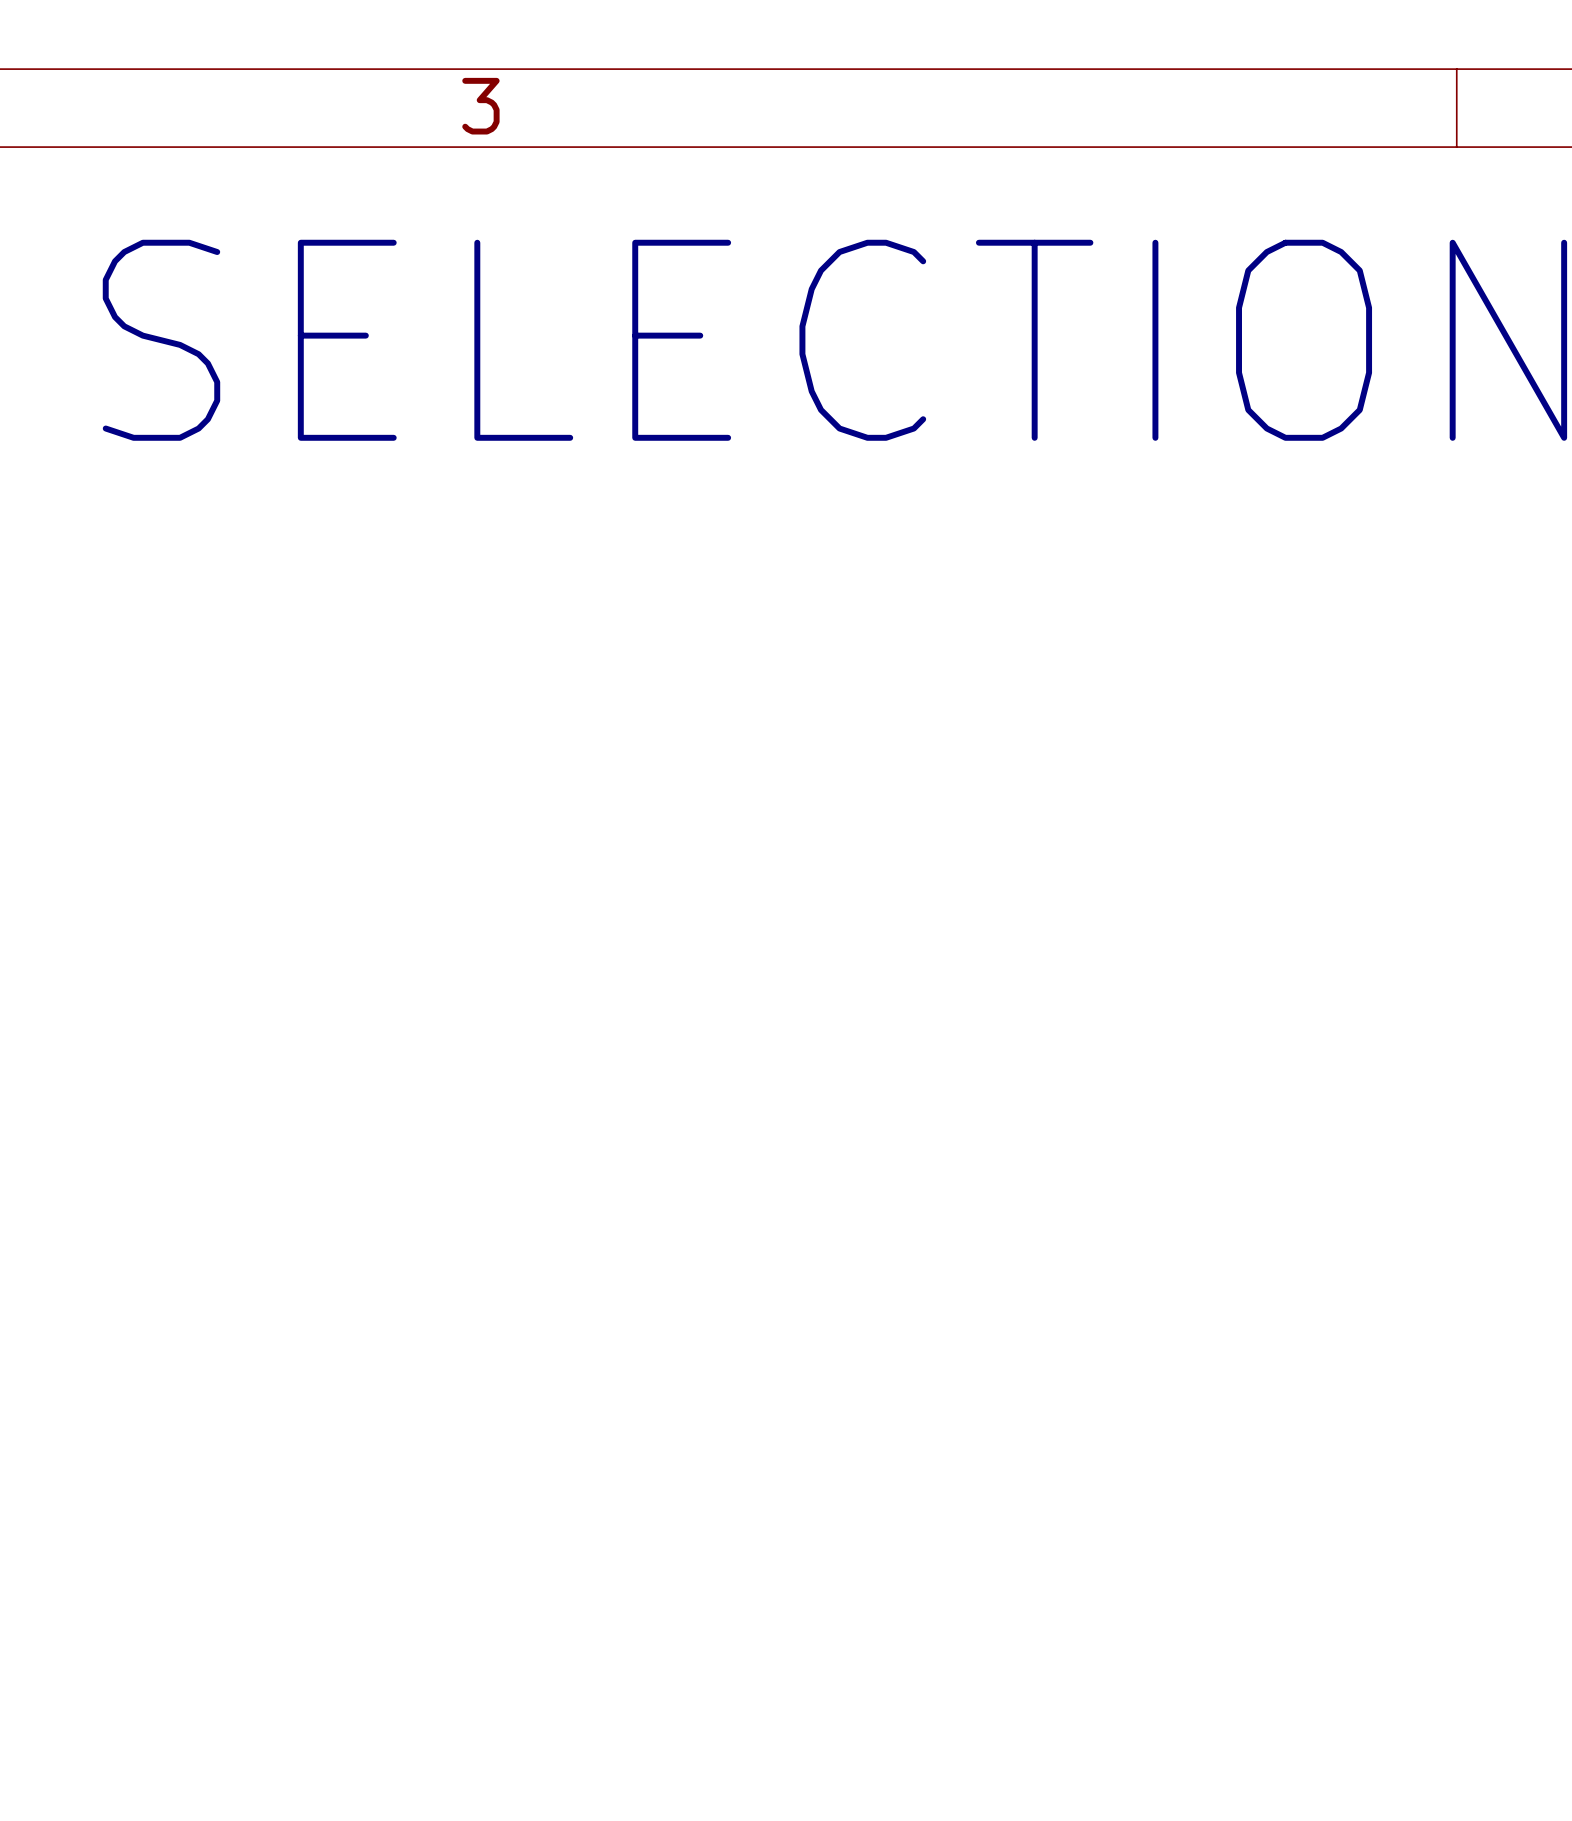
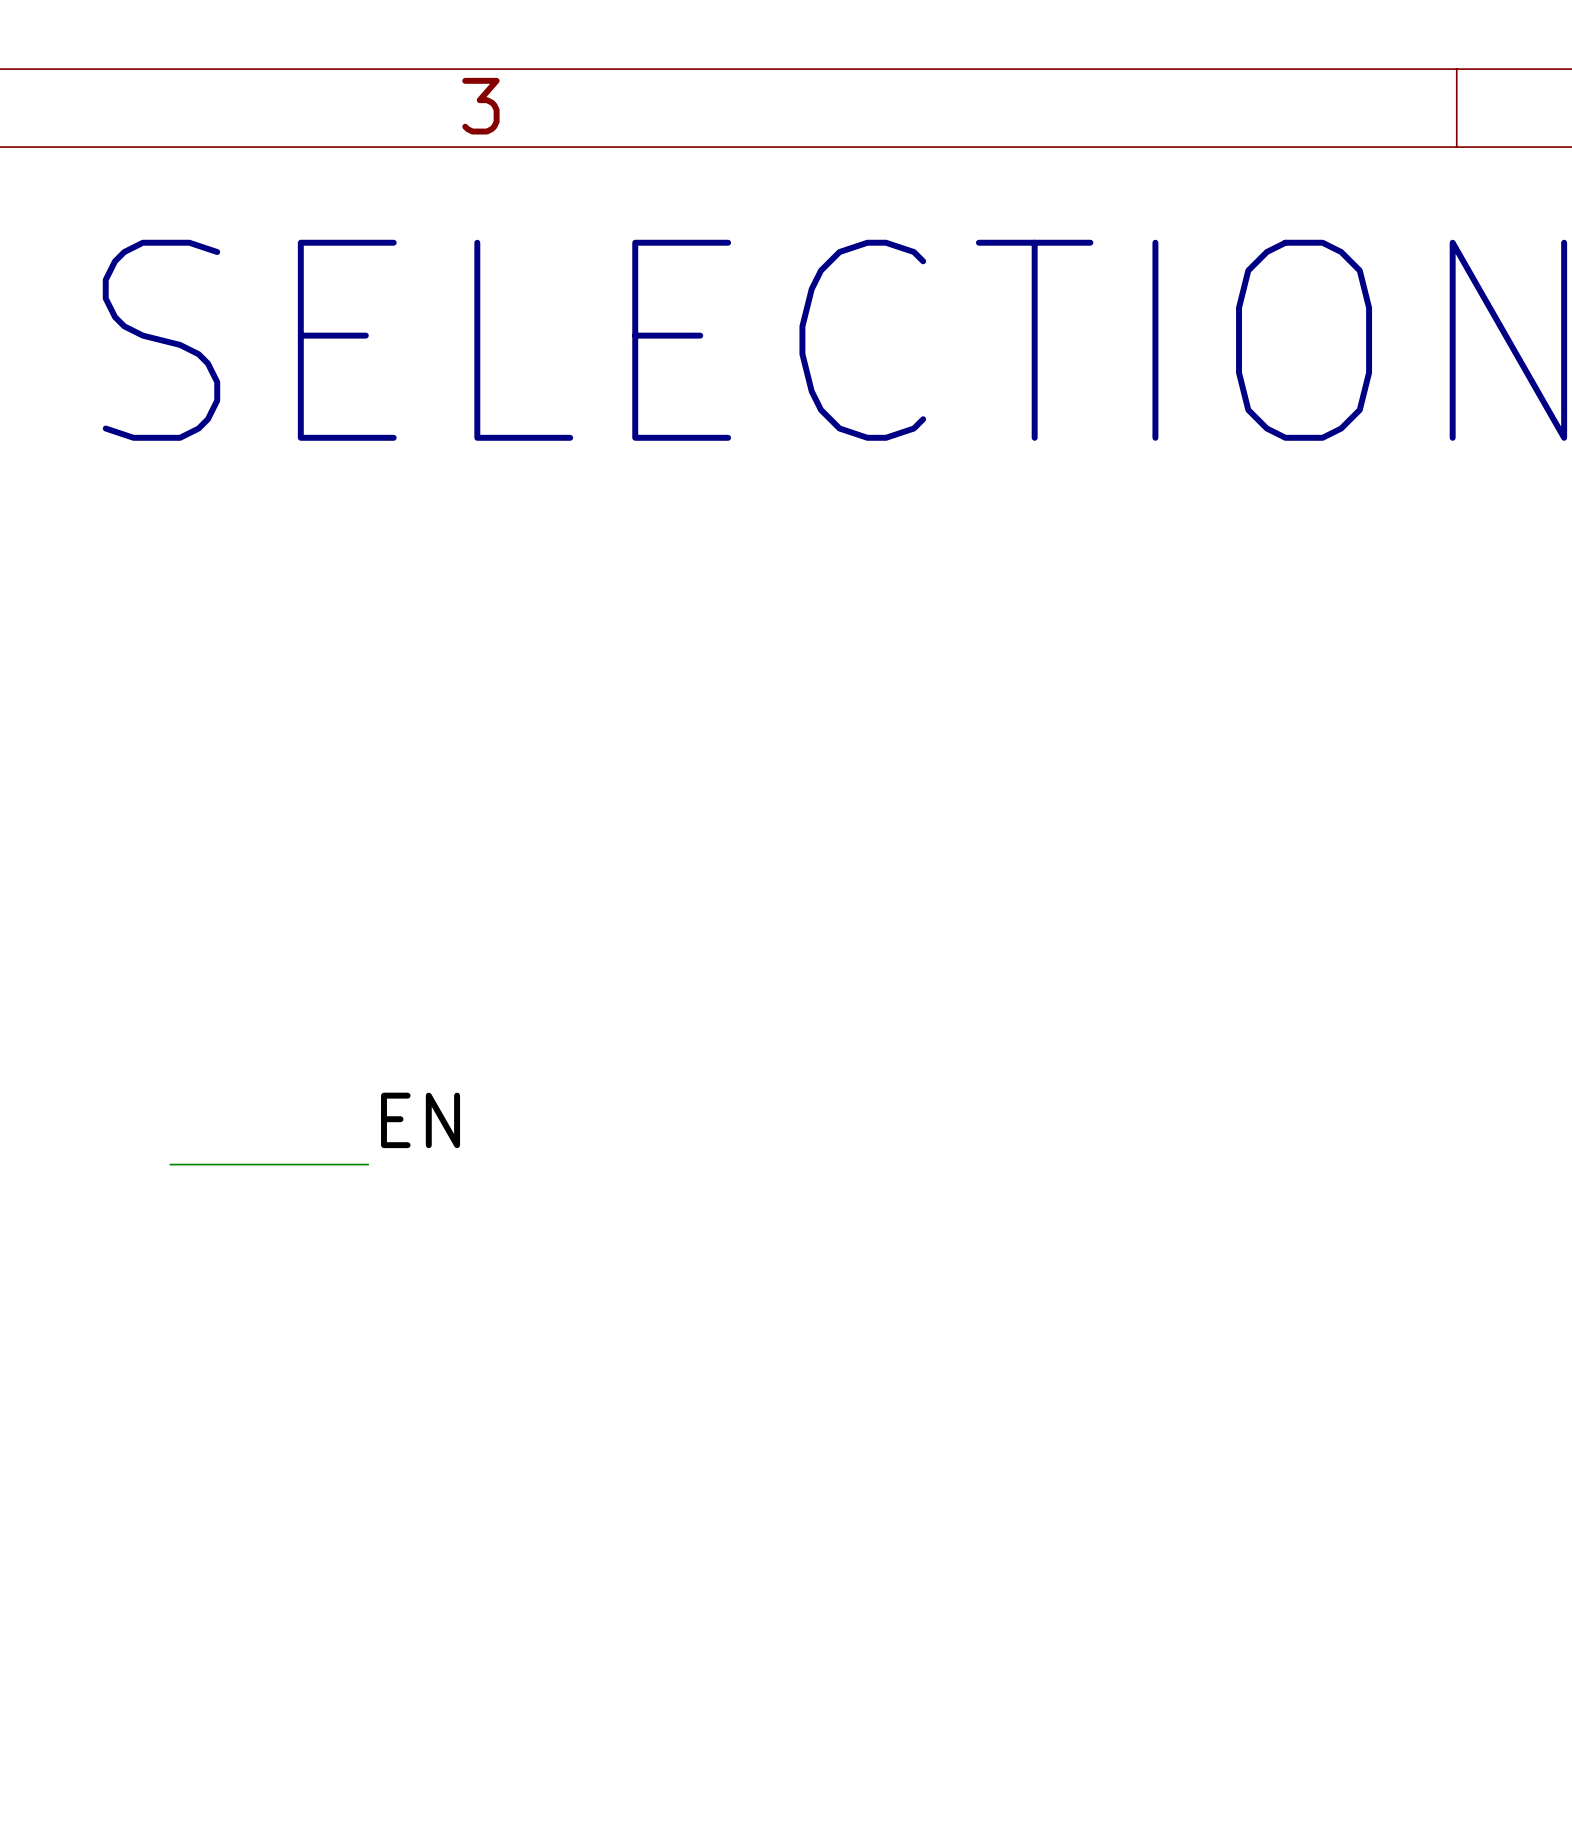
label: none -> EN (420, 1120)
wire: none -> (170, 1164) (368, 1164)

